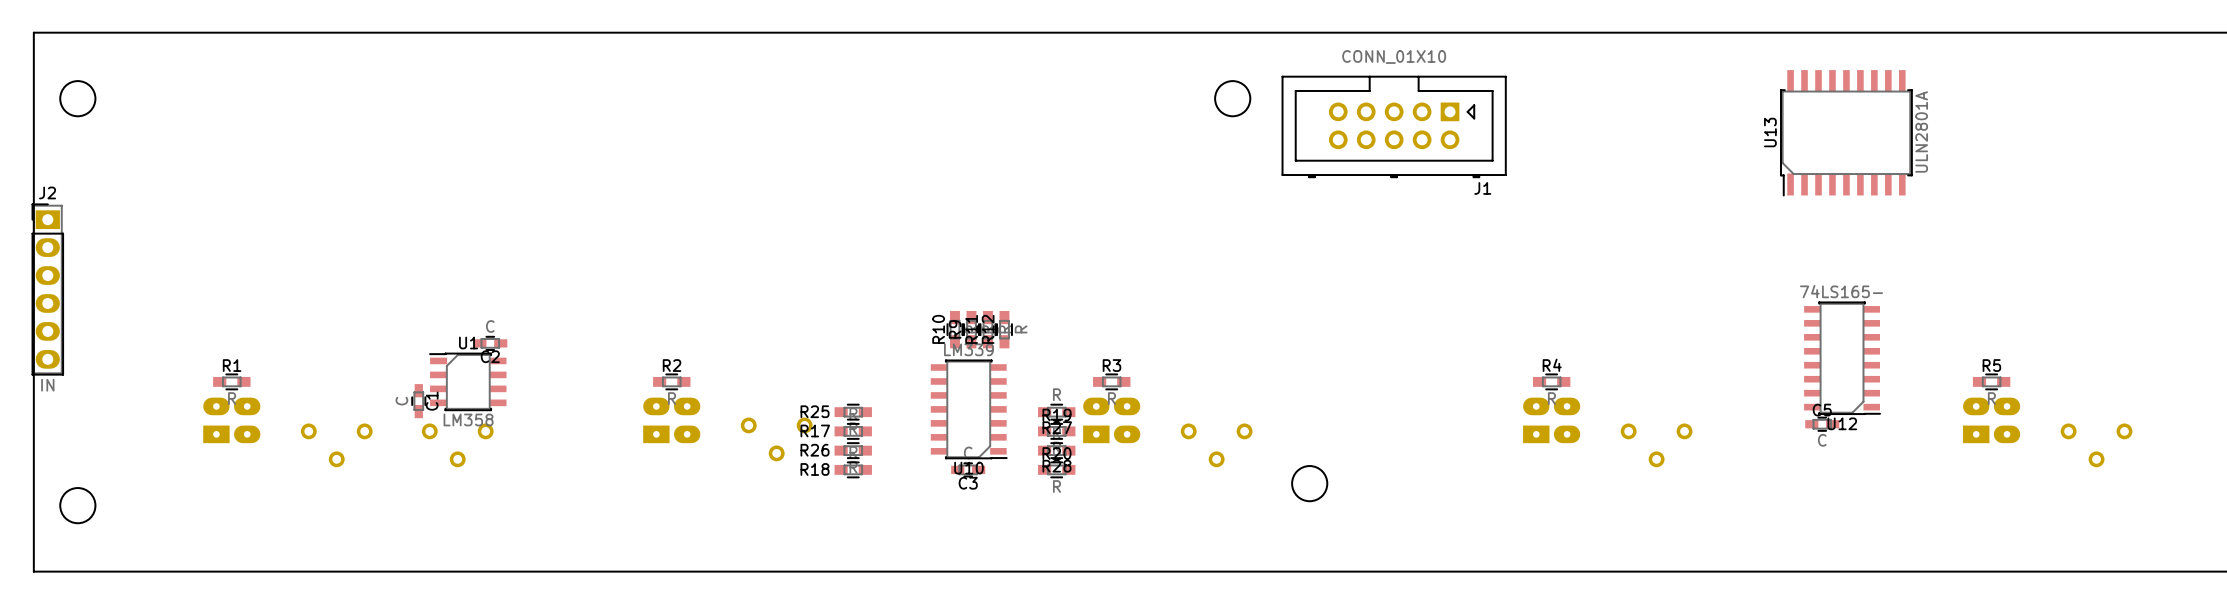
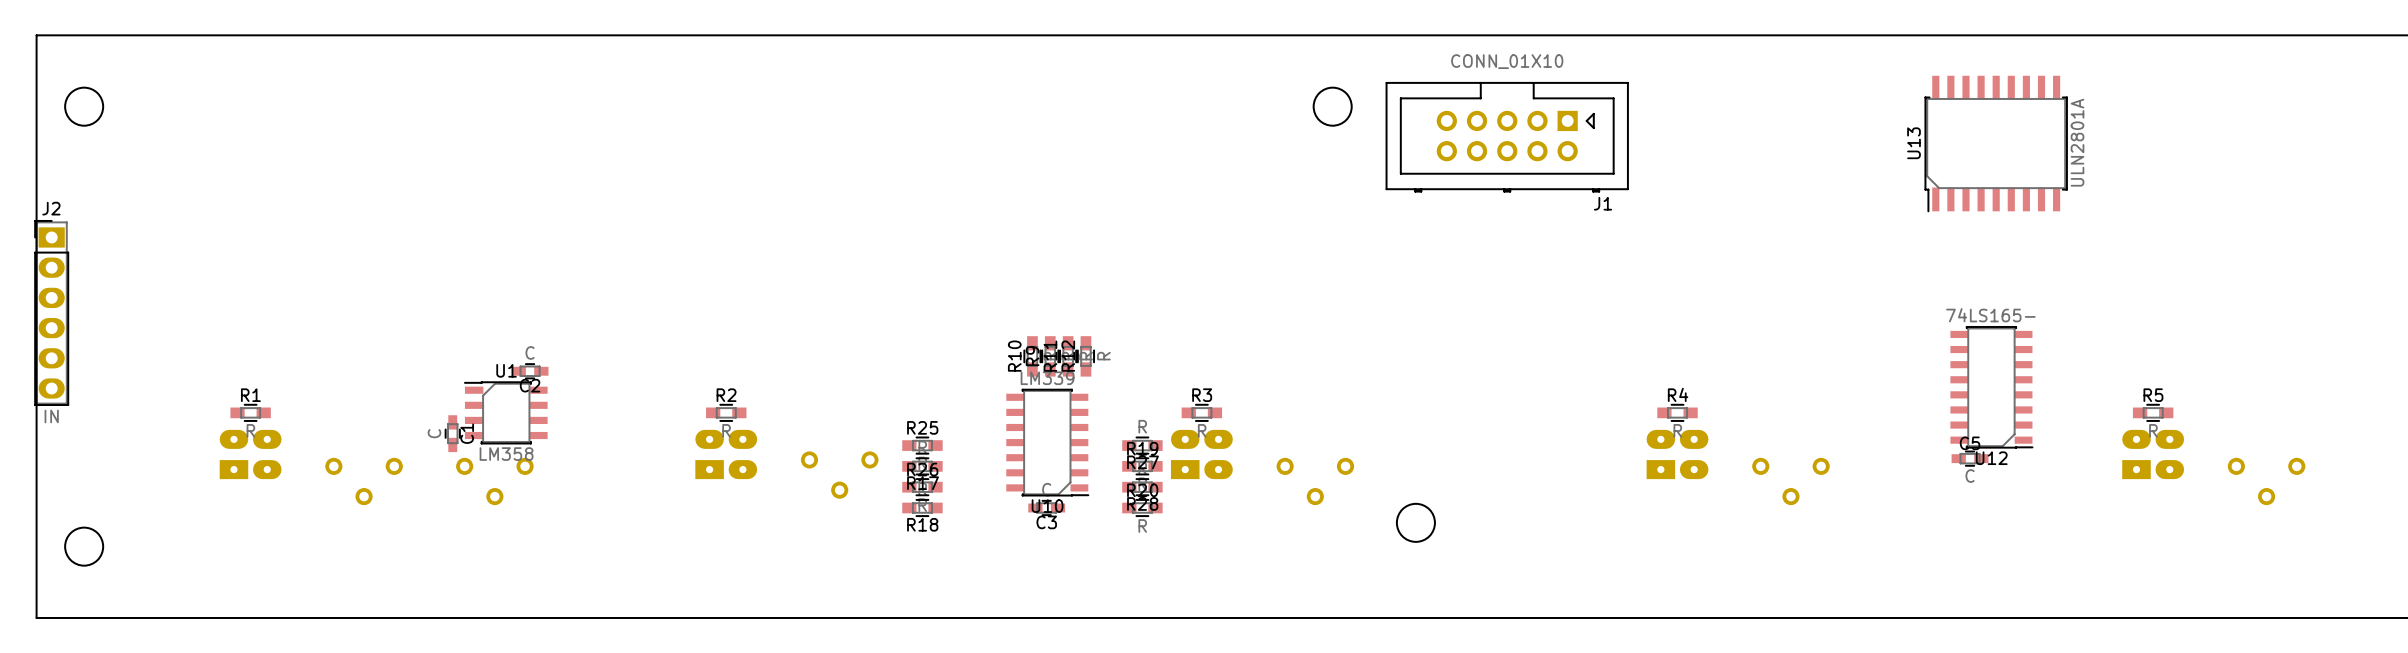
R25 name position: R25 (815, 411) -> R25 (922, 427)
R17 name position: R17 (815, 430) -> R17 (923, 483)
R26 name position: R26 (815, 450) -> R26 (922, 469)
R18 name position: R18 (815, 469) -> R18 (922, 524)

